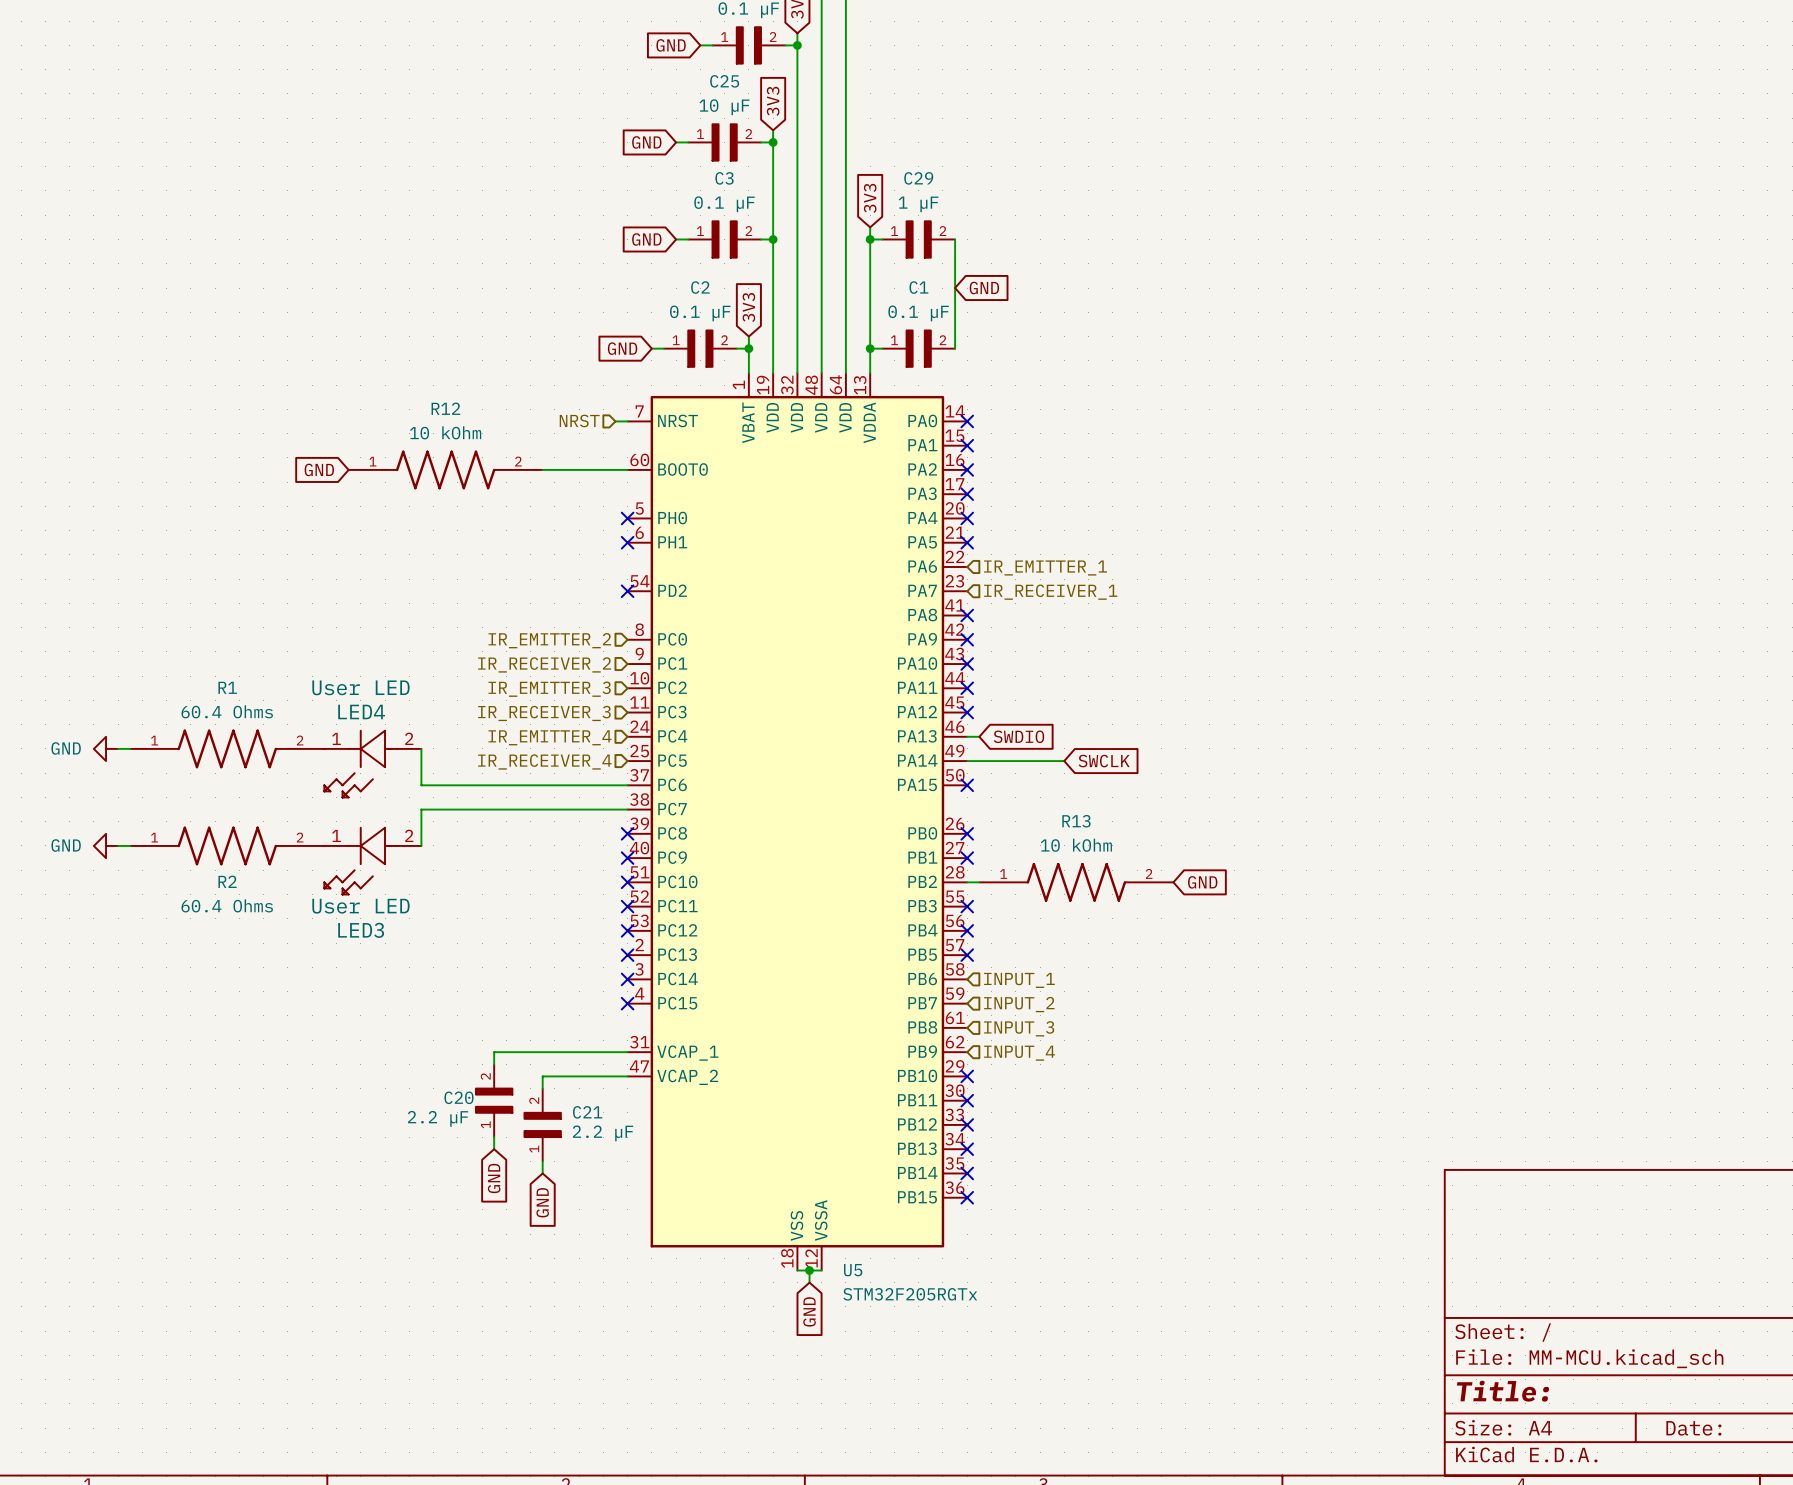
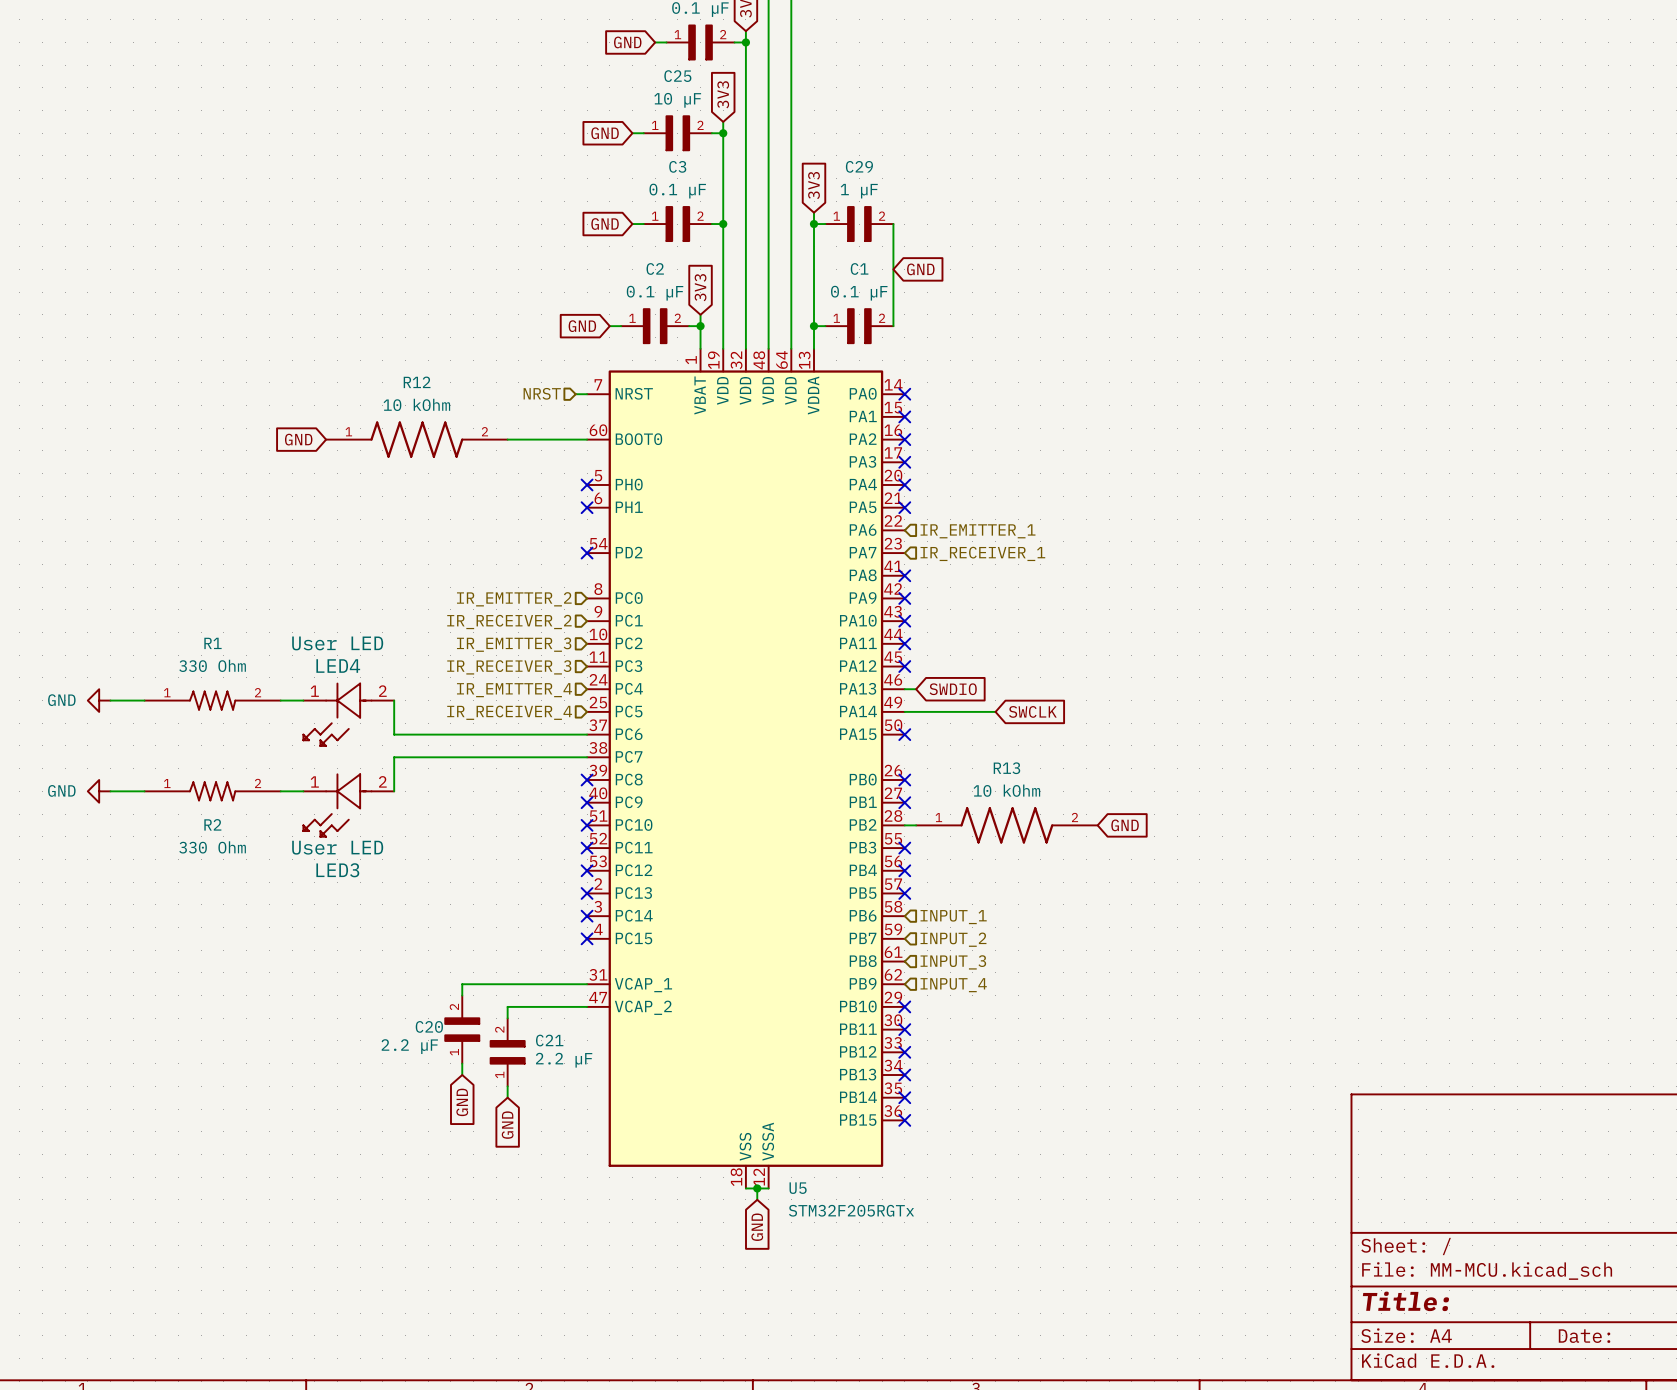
R1 value: 60.4 Ohms (227, 711) -> 330 Ohm (212, 665)
R1 symbol: [130, 729, 325, 769] -> [144, 690, 281, 711]
R2 symbol: [130, 826, 325, 866] -> [144, 781, 281, 802]
R2 value: 60.4 Ohms (227, 905) -> 330 Ohm (212, 847)

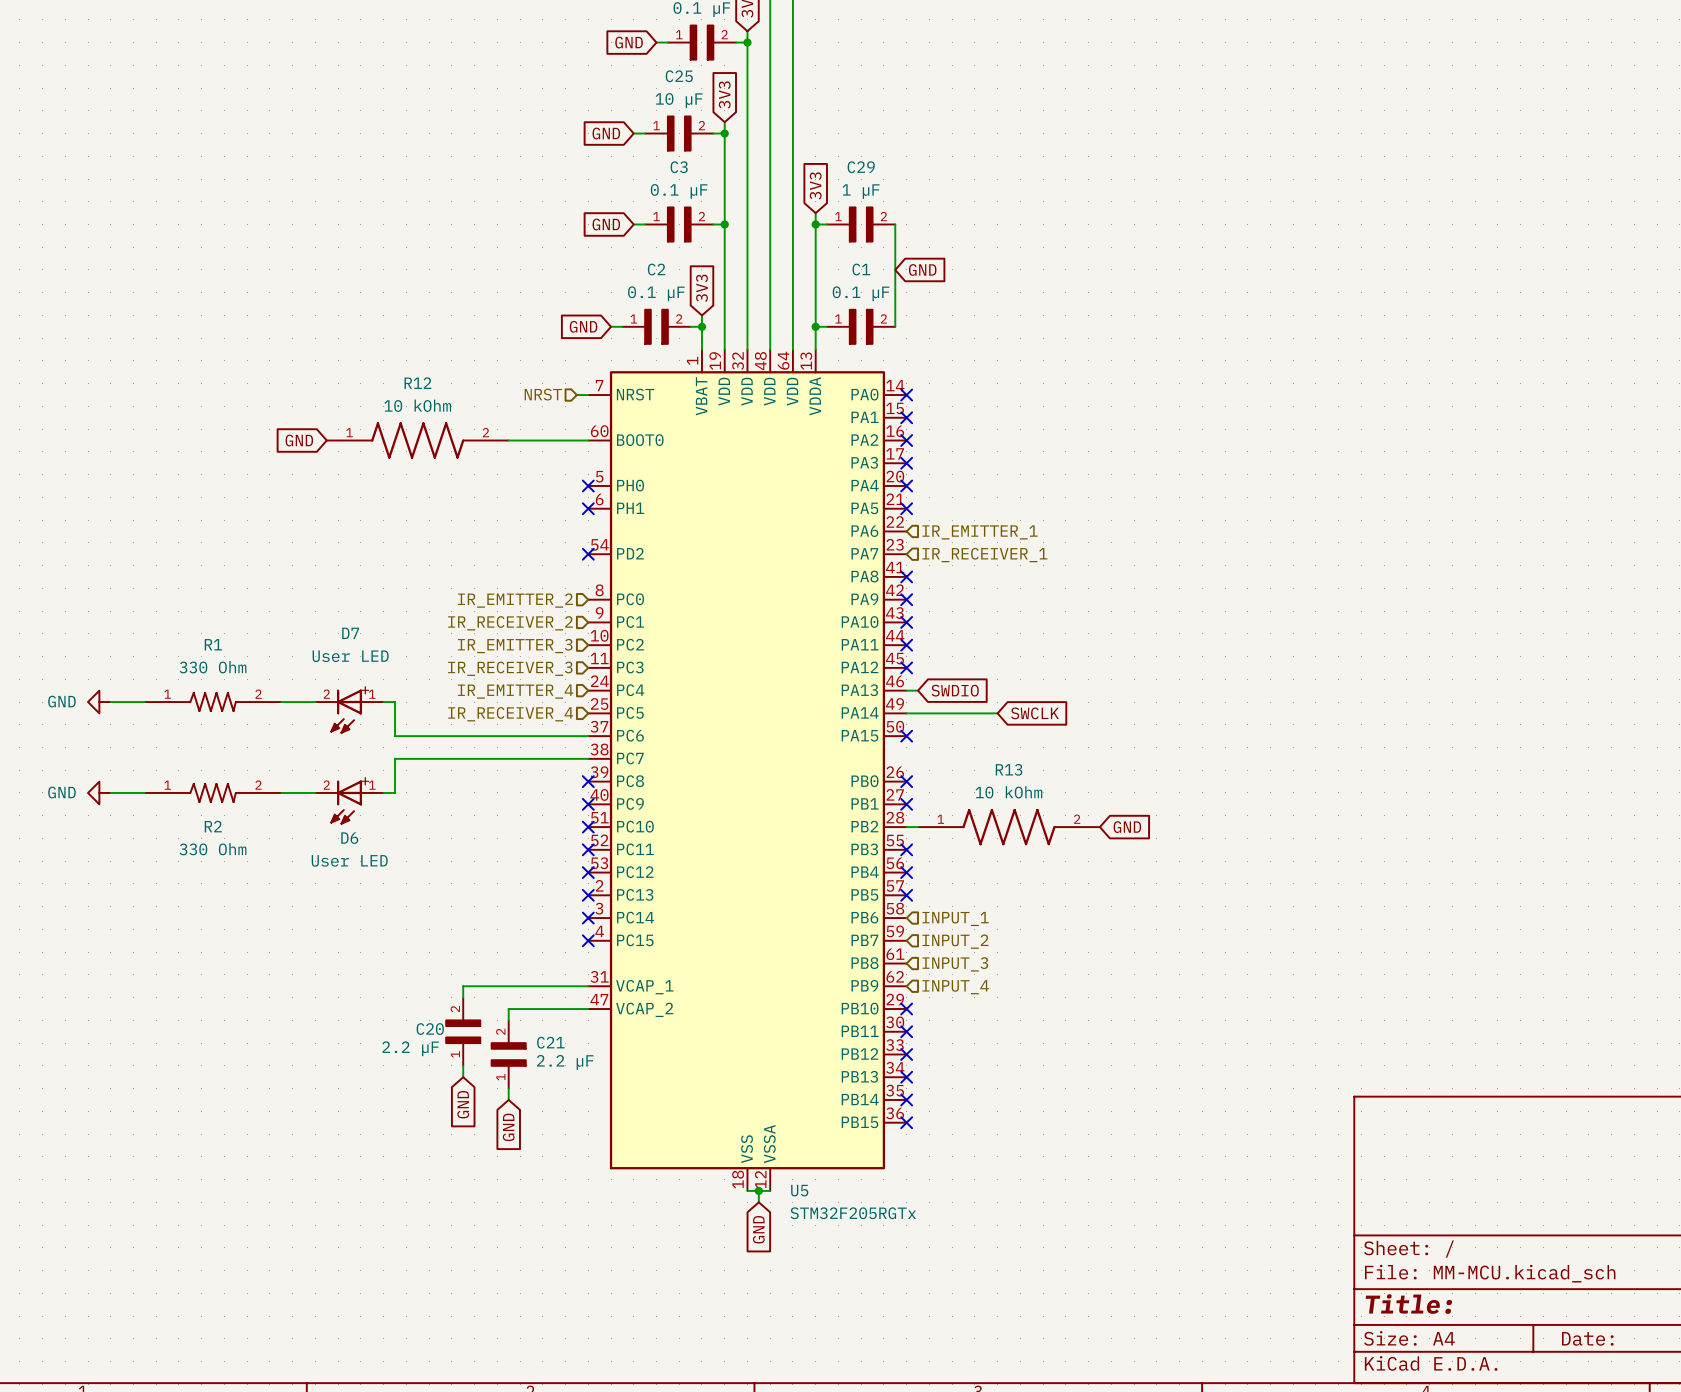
D7: none -> User LED (349, 711)
LED4: User LED (348, 714) -> none
D6: none -> User LED (349, 802)
LED3: User LED (348, 805) -> none

